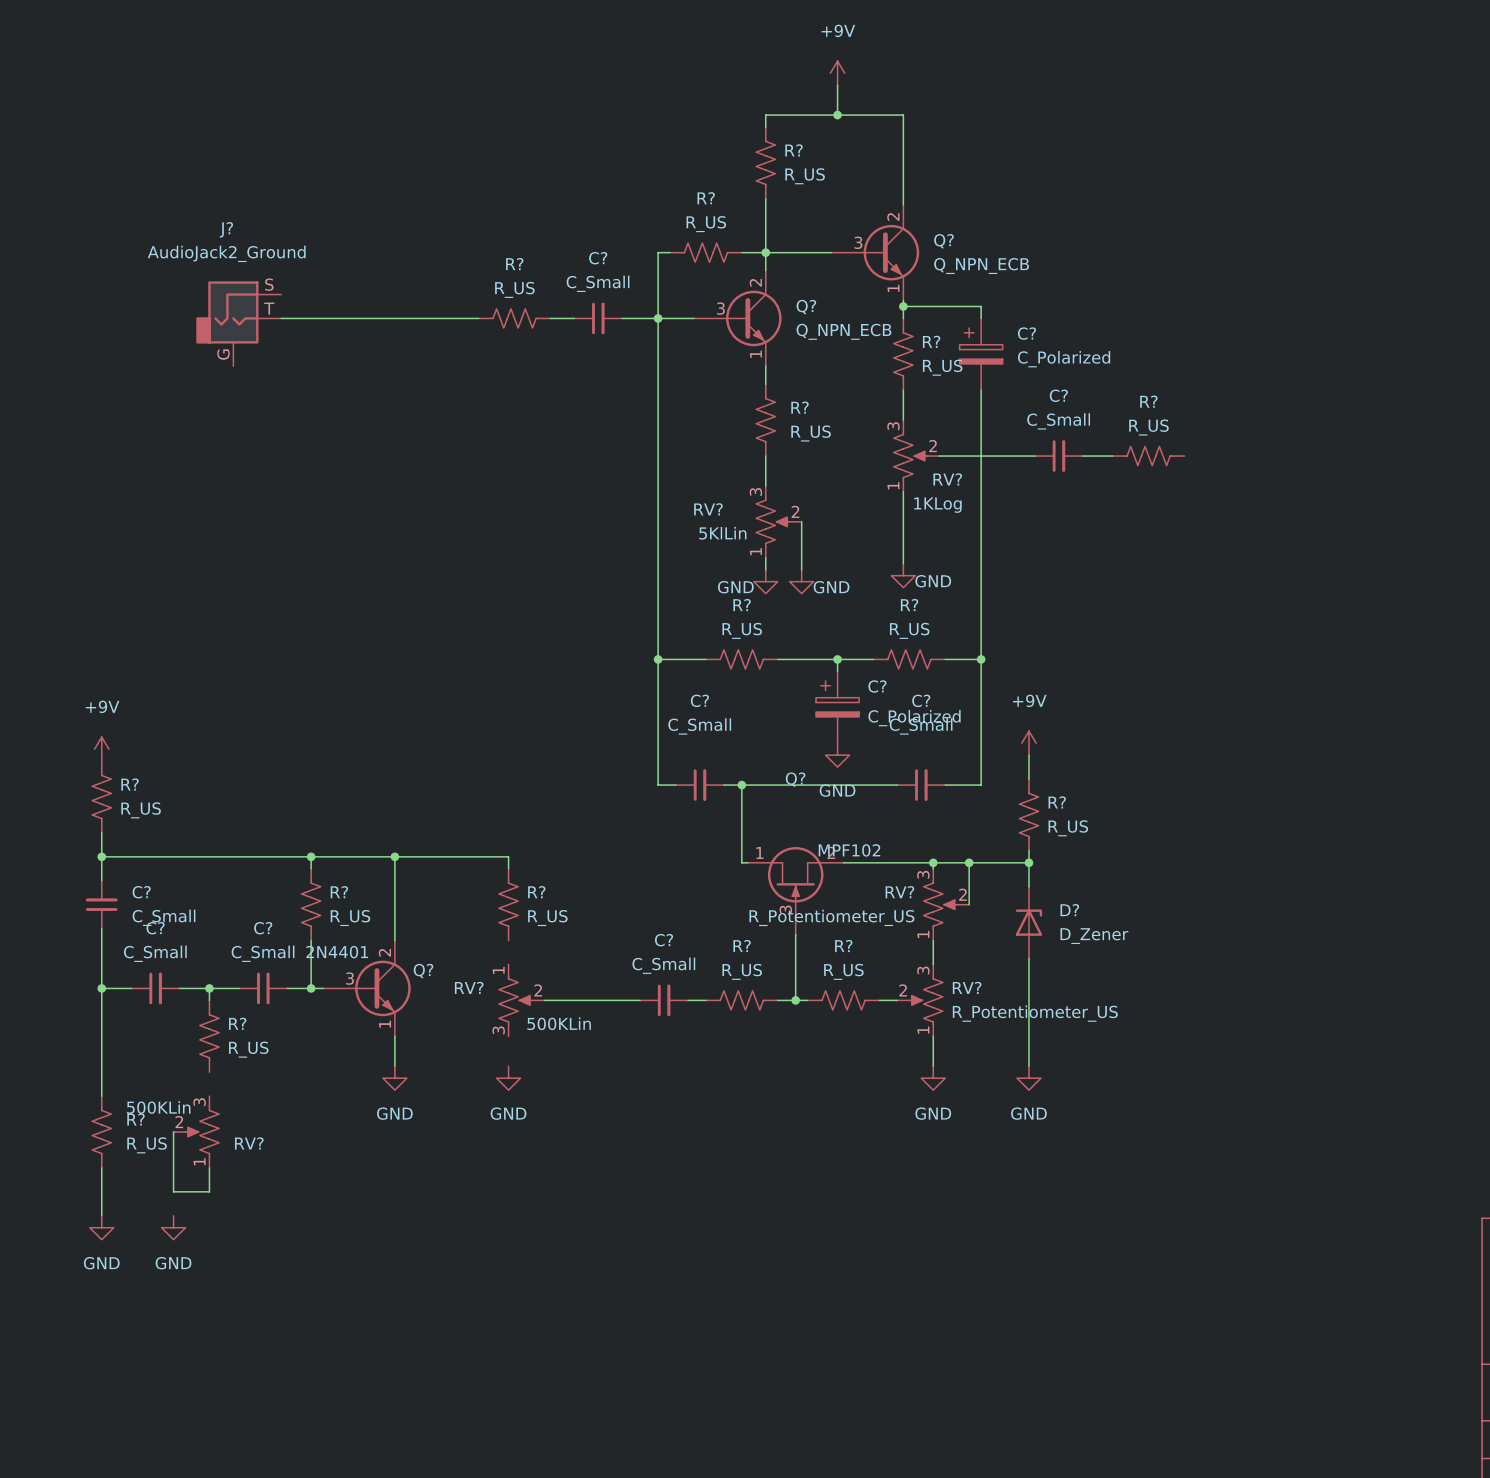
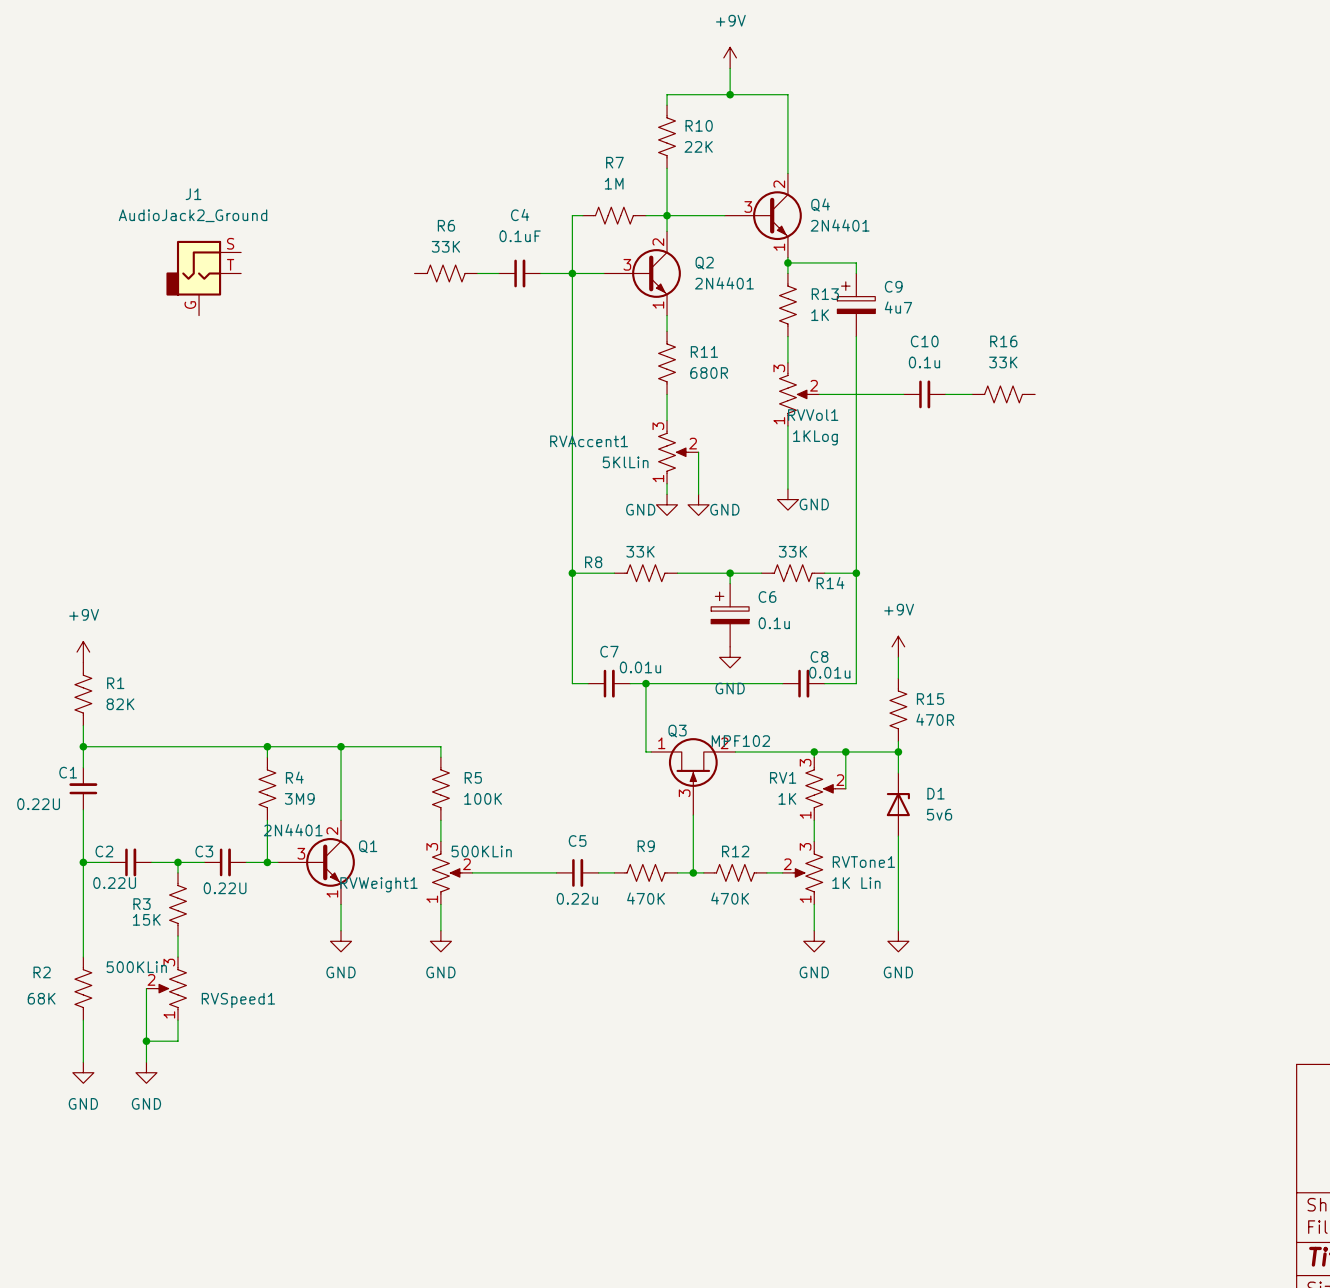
R? name: R? (794, 150) -> R10 (699, 125)
R? value: R_US (805, 176) -> 22K (698, 146)
R? name: R? (706, 198) -> R7 (614, 162)
R? value: R_US (706, 224) -> 1M (614, 183)
J? name: J? (226, 229) -> J1 (193, 194)
Q? name: Q? (943, 241) -> Q4 (820, 204)
C? name: C? (598, 258) -> C4 (520, 215)
R? name: R? (514, 264) -> R6 (446, 225)
Q? value: Q_NPN_ECB (981, 266) -> 2N4401 (840, 225)
C? value: C_Small (598, 283) -> 0.1uF (520, 236)
R? value: R_US (514, 289) -> 33K (445, 246)
Q? name: Q? (806, 307) -> Q2 (704, 263)
wire: (281, 318) (478, 318) -> none
Q? value: Q_NPN_ECB (843, 331) -> 2N4401 (724, 283)
C? name: C? (1026, 333) -> C9 (893, 286)
R? name: R? (931, 341) -> R13 (825, 294)
C? value: C_Polarized (1064, 359) -> 4u7 (898, 307)
R? value: R_US (942, 367) -> 1K (820, 315)
C? name: C? (1058, 395) -> C10 (924, 341)
R? name: R? (1148, 401) -> R16 (1003, 341)
R? name: R? (799, 407) -> R11 (704, 351)
C? value: C_Small (1058, 421) -> 0.1u (924, 362)
R? value: R_US (1148, 427) -> 33K (1003, 362)
R? value: R_US (811, 433) -> 680R (709, 373)
RV? name: RV? (947, 479) -> RVVol1 (813, 415)
RV? name: RV? (708, 509) -> RVAccent1 (589, 441)
R? name: R? (742, 605) -> R8 (593, 562)
R? name: R? (909, 605) -> R14 (830, 583)
R? value: R_US (742, 630) -> 33K (640, 551)
R? value: R_US (909, 630) -> 33K (792, 551)
C? name: C? (877, 686) -> C6 (767, 597)
C? name: C? (699, 700) -> C7 (609, 651)
C? name: C? (921, 700) -> C8 (819, 656)
C? value: C_Polarized (914, 718) -> 0.1u (774, 623)
C? value: C_Small (699, 726) -> 0.01u (640, 667)
C? value: C_Small (921, 726) -> 0.01u (829, 672)
Q? name: Q? (795, 779) -> Q3 (677, 731)
R? name: R? (130, 784) -> R1 (115, 683)
R? name: R? (1057, 802) -> R15 (930, 699)
R? value: R_US (141, 810) -> 82K (120, 704)
R? value: R_US (1068, 828) -> 470R (935, 719)
C? name: C? (141, 892) -> C1 (68, 772)
R? name: R? (339, 892) -> R4 (294, 777)
R? name: R? (536, 892) -> R5 (473, 777)
RV? name: RV? (899, 892) -> RV1 (783, 777)
D? name: D? (1069, 910) -> D1 (936, 793)
C? value: C_Small (163, 917) -> 0.22U (38, 804)
RV? value: R_Potentiometer_US (831, 917) -> 1K (787, 798)
R? value: R_US (350, 918) -> 3M9 (299, 798)
R? value: R_US (547, 918) -> 100K (483, 798)
C? name: C? (155, 928) -> C2 (104, 851)
C? name: C? (263, 928) -> C3 (204, 851)
D? value: D_Zener (1094, 936) -> 5v6 (939, 814)
wire: none -> (440, 820) (440, 841)
C? name: C? (664, 940) -> C5 (577, 840)
R? name: R? (742, 946) -> R9 (646, 846)
R? name: R? (843, 946) -> R12 (735, 851)
C? value: C_Small (155, 953) -> 0.22U (114, 883)
C? value: C_Small (263, 953) -> 0.22U (225, 888)
C? value: C_Small (663, 965) -> 0.22u (577, 898)
Q? name: Q? (423, 971) -> Q1 (368, 846)
R? value: R_US (742, 971) -> 470K (645, 898)
R? value: R_US (843, 971) -> 470K (730, 898)
RV? name: RV? (967, 987) -> RVTone1 (863, 862)
RV?: 500KLin (521, 1000) -> none
RVWeight1: none -> 500KLin (452, 872)
RV? value: R_Potentiometer_US (1035, 1013) -> 1K Lin (856, 883)
R? name: R? (237, 1023) -> R3 (142, 904)
wire: none -> (440, 904) (440, 930)
R? value: R_US (248, 1049) -> 15K (146, 919)
wire: none -> (178, 936) (178, 957)
R? name: R? (135, 1119) -> R2 (42, 972)
RV? name: RV? (249, 1143) -> RVSpeed1 (238, 1000)
R? value: R_US (147, 1145) -> 68K (41, 998)
wire: none -> (146, 1041) (146, 1062)
junction: none -> (146, 1041)

